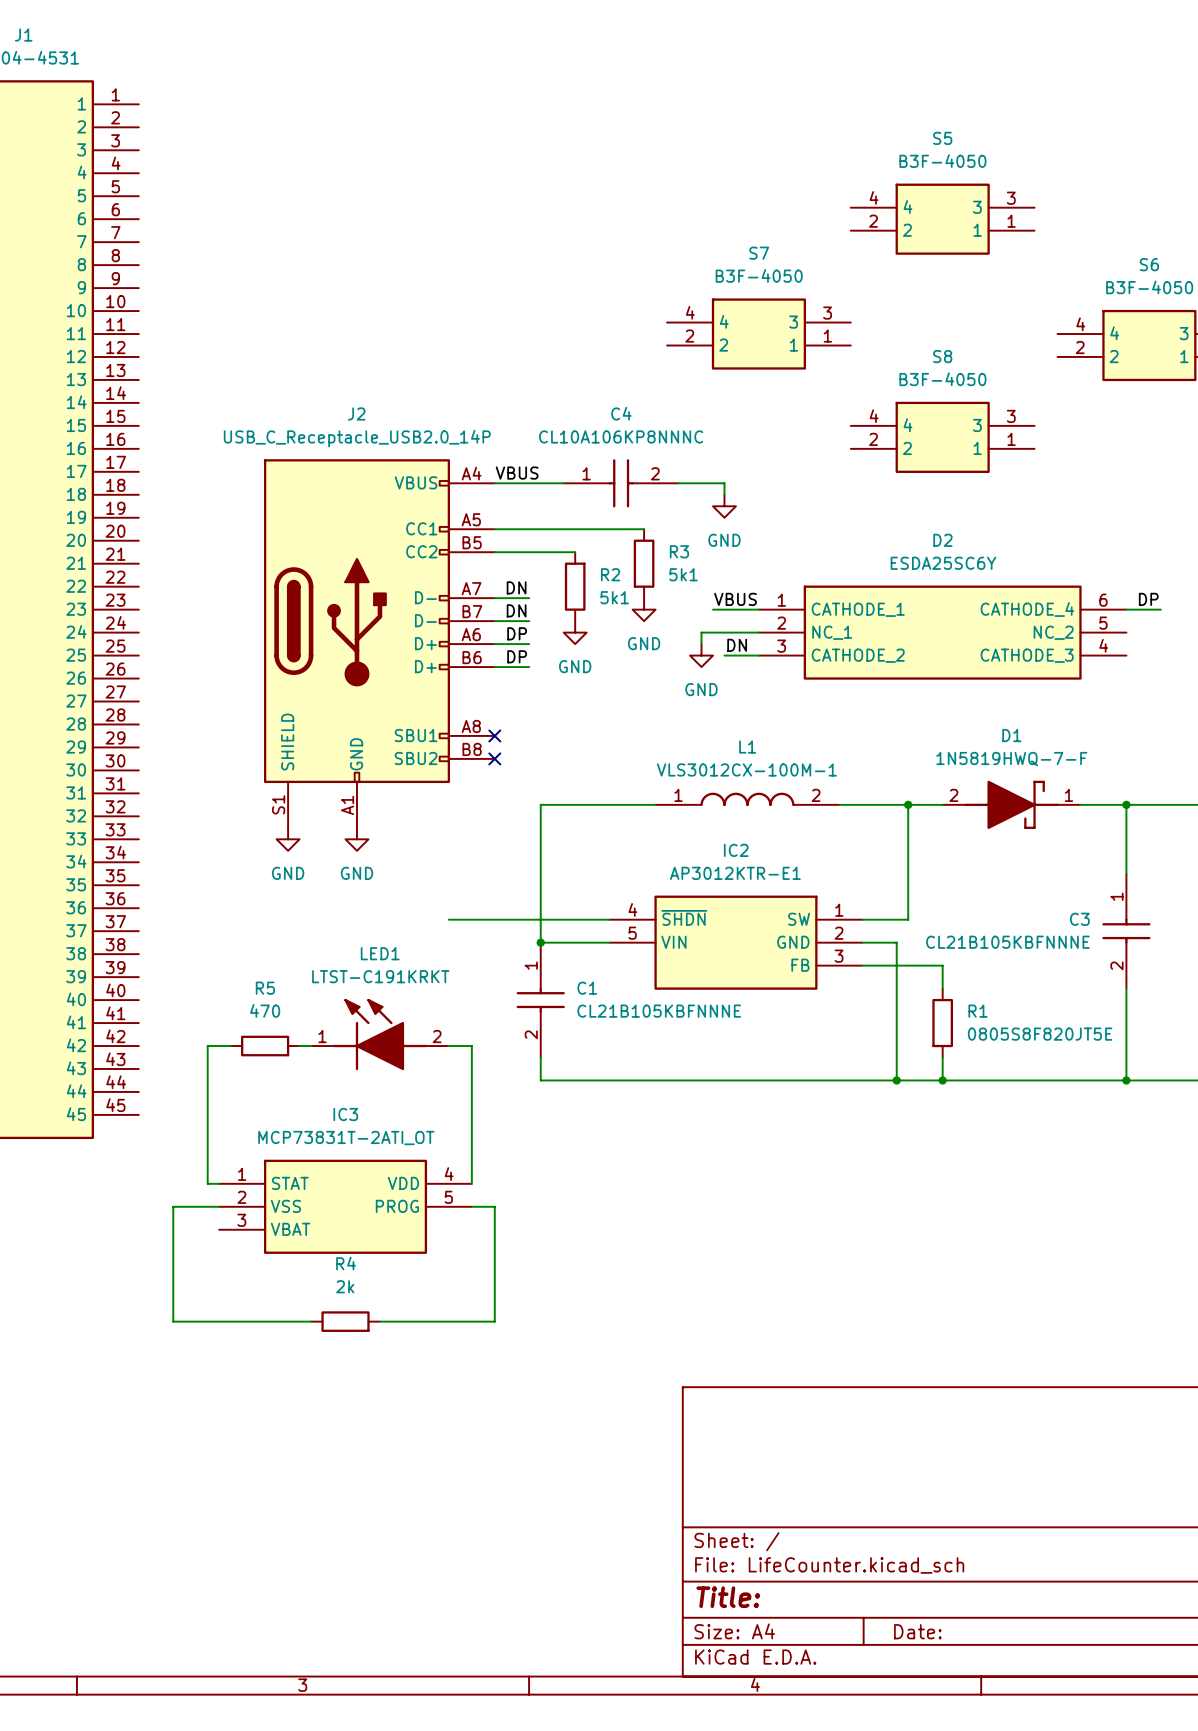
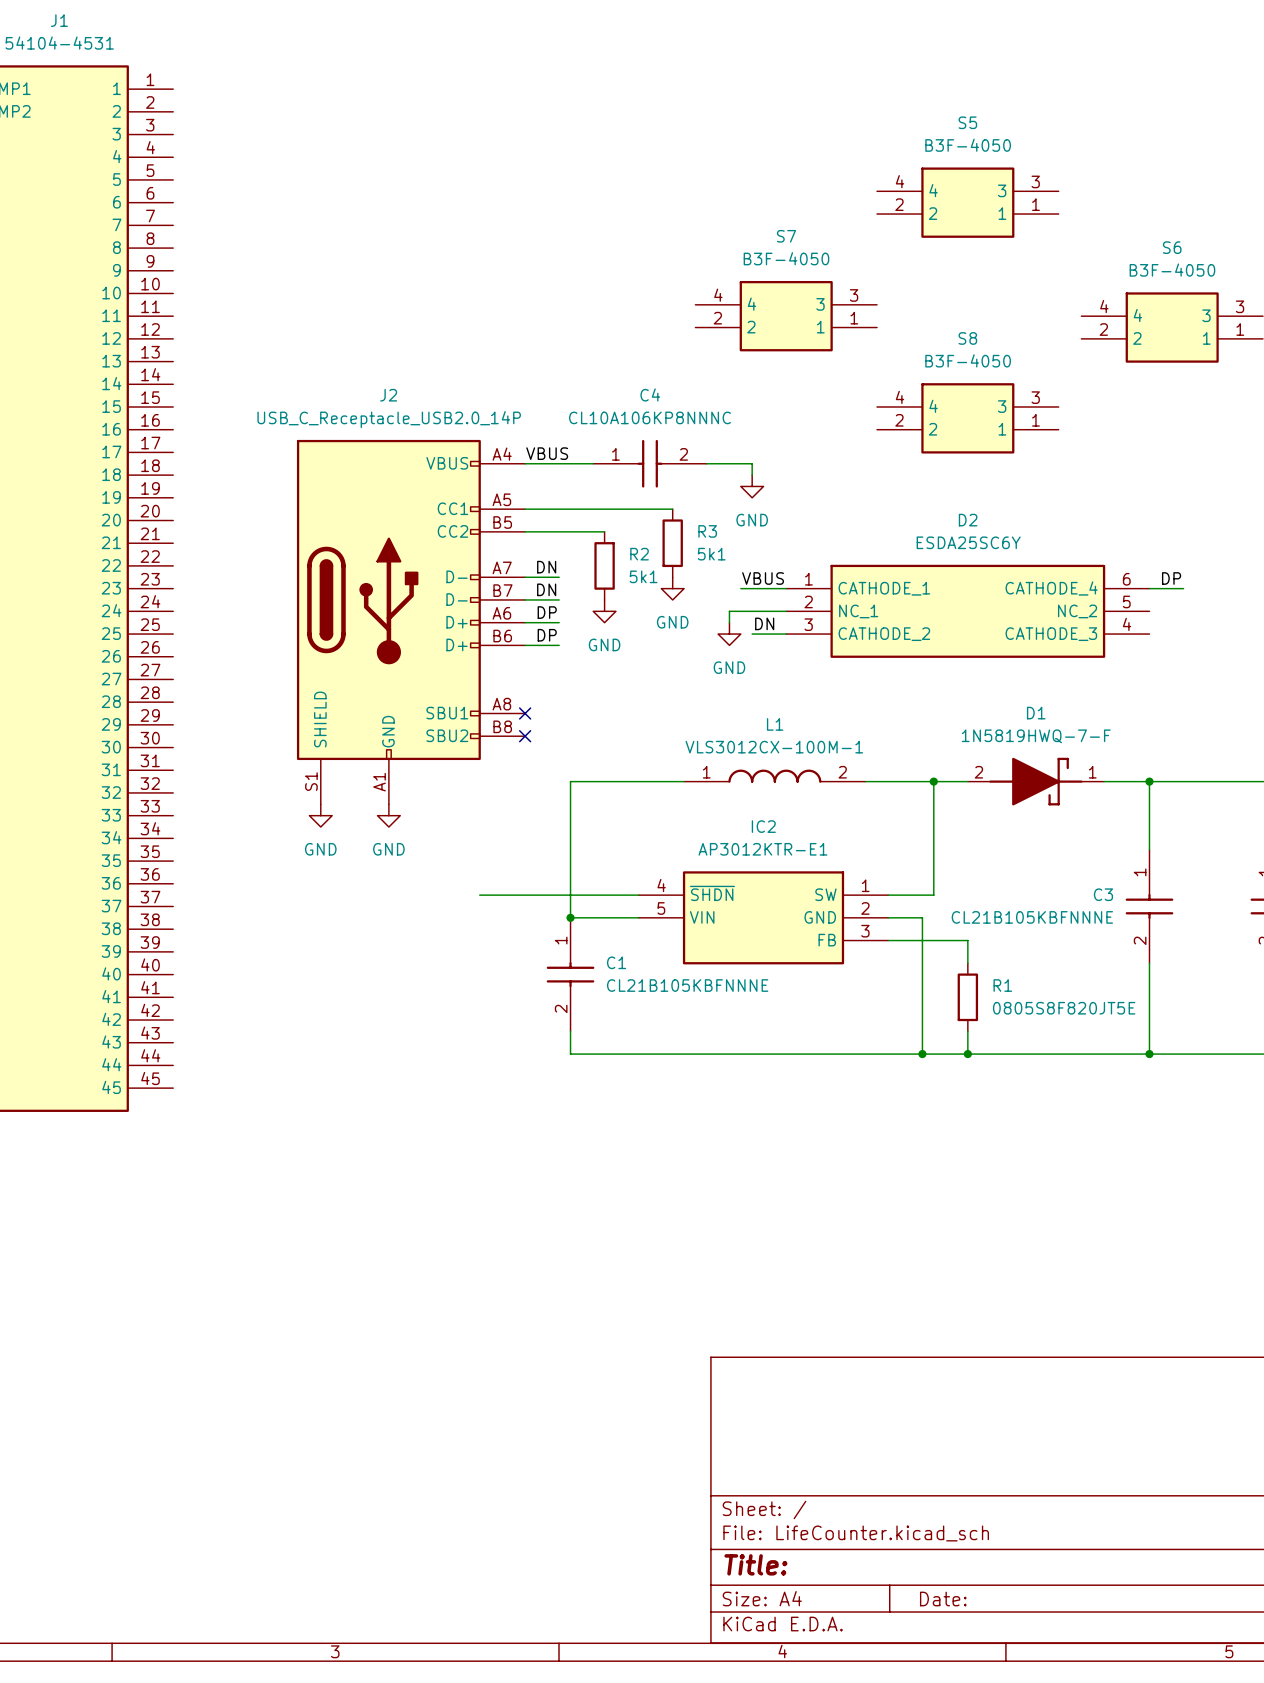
LED1: LTST-C191KRKT (379, 1034) -> none
wire: (230, 1046) (207, 1046) (207, 1183) (219, 1183) -> none
R5: 470 (265, 1046) -> none
wire: (299, 1046) (311, 1046) -> none
wire: (448, 1046) (471, 1046) (471, 1183) -> none
wire: (219, 1206) (173, 1206) (173, 1321) (311, 1321) -> none
IC3: MCP73831T-2ATI_OT (345, 1206) -> none
wire: (471, 1206) (494, 1206) (494, 1321) (379, 1321) -> none
R4: 2k (345, 1321) -> none

